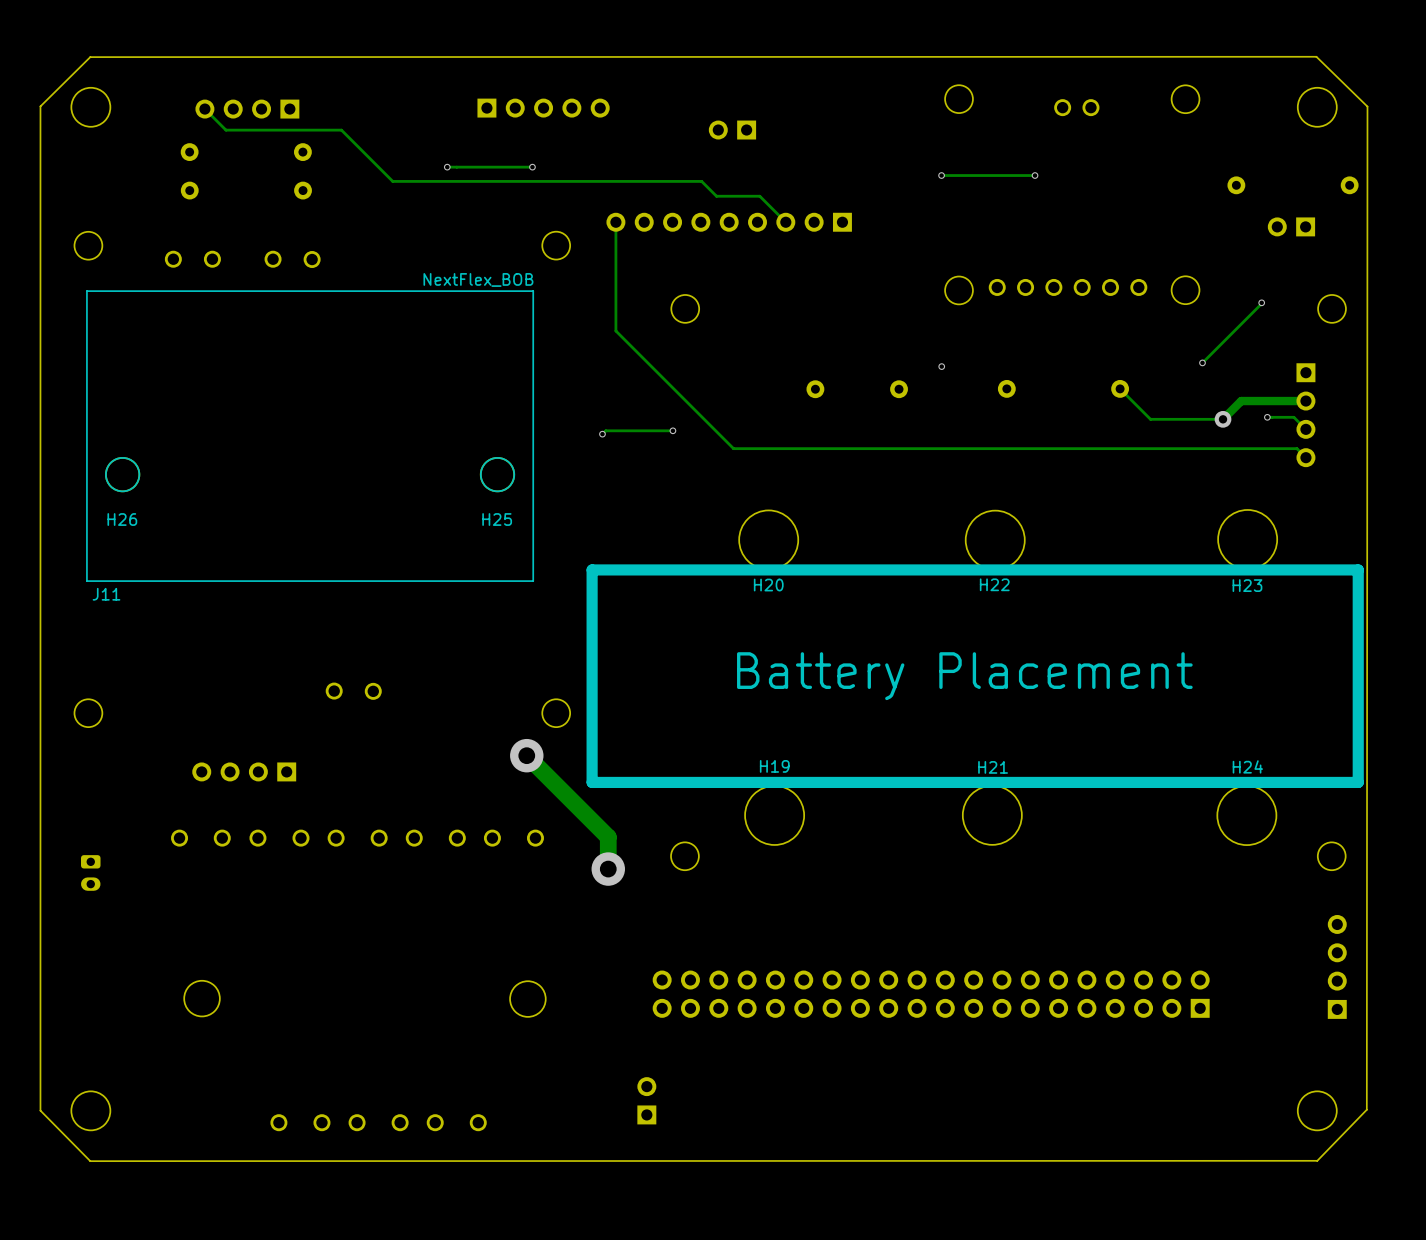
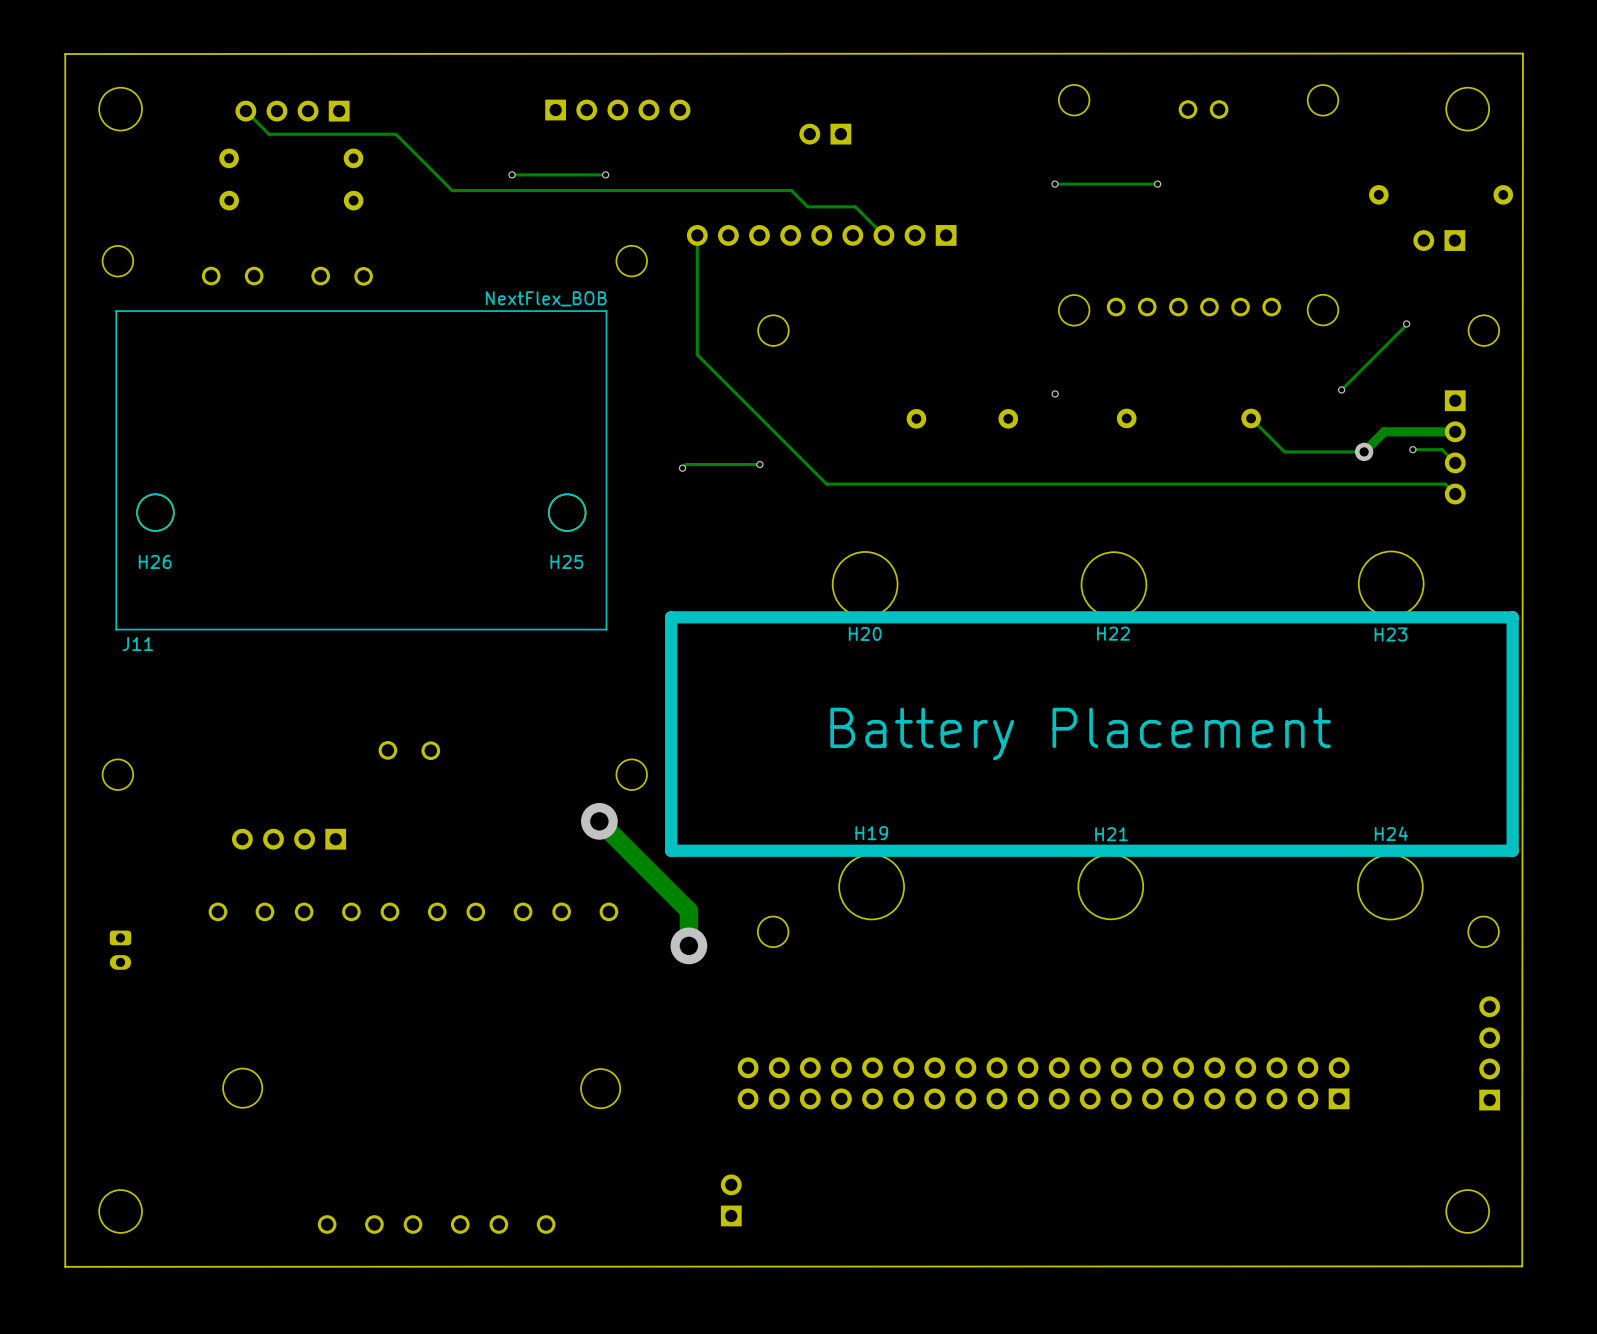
board edge: (40, 106) (90, 57) (1316, 56) (1367, 106) (1366, 1109) (1317, 1160) (90, 1161) (40, 1110) -> (65, 108) (65, 54) (1522, 53) (1522, 1266) (65, 1266) (65, 1211)

